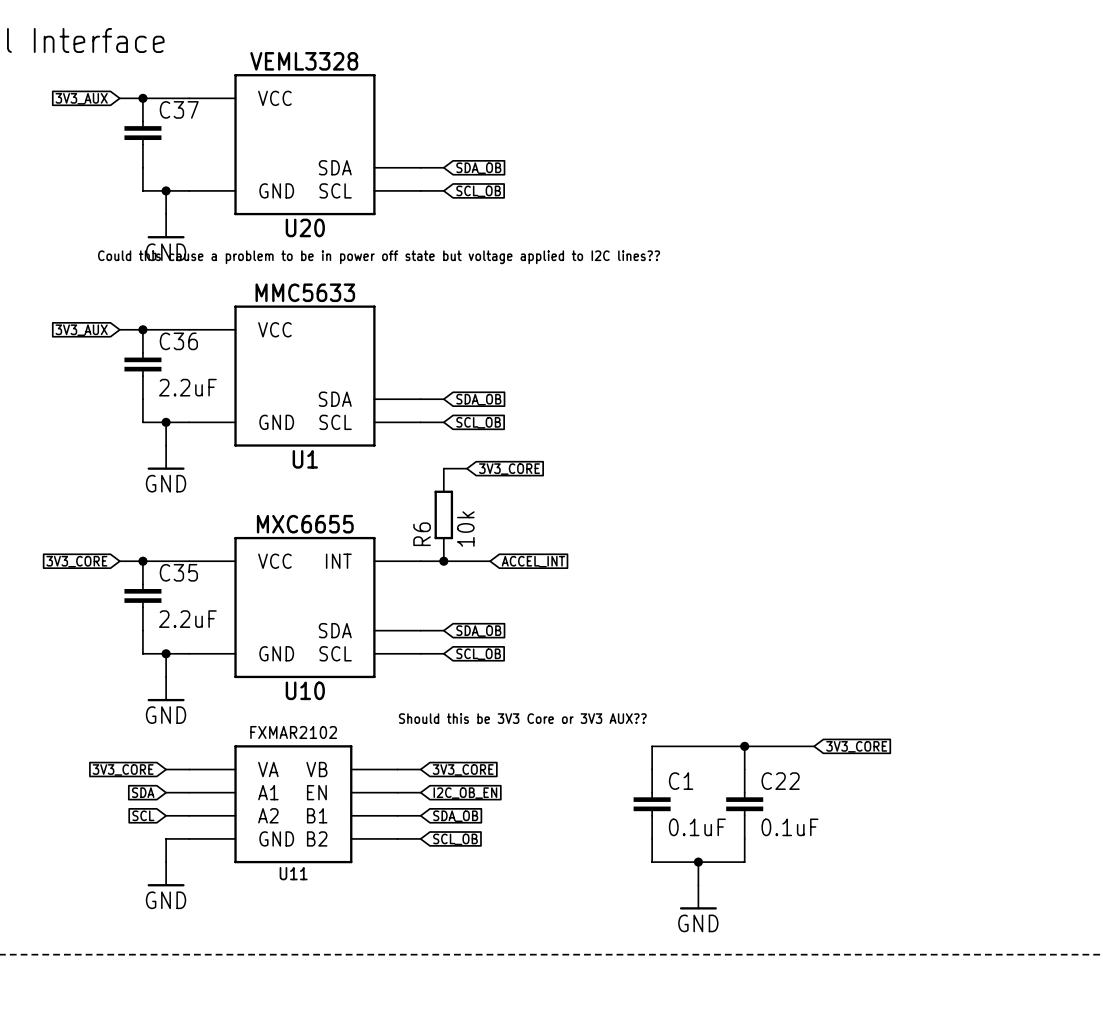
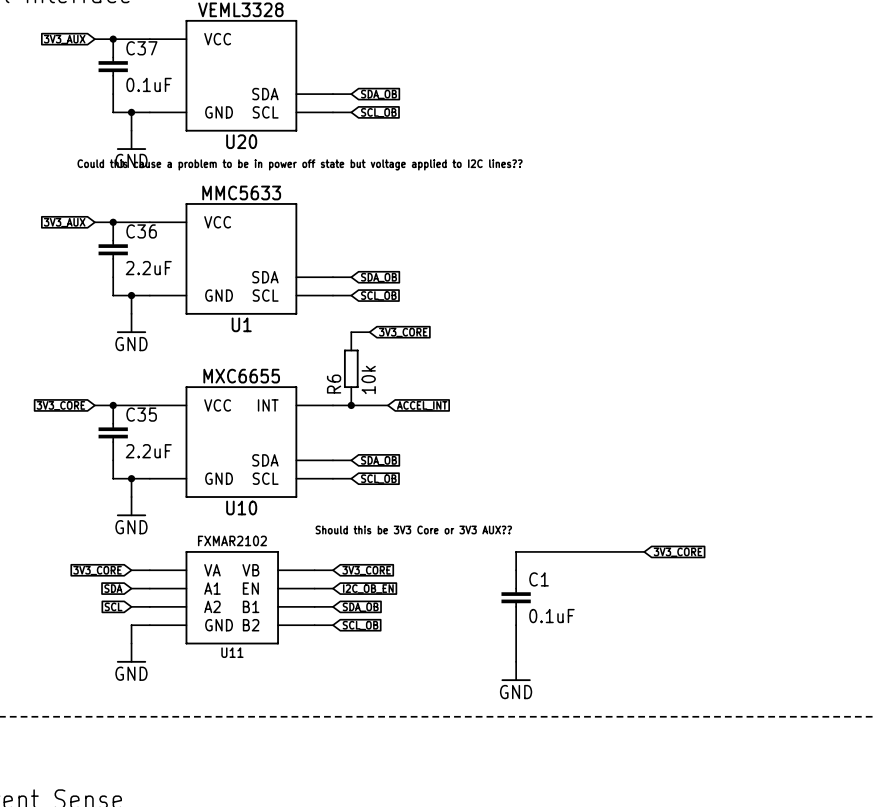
C37 value: none -> 0.1uF (149, 84)
wire: (744, 746) (744, 769) -> none
junction: (744, 746) -> none
C22: 0.1uF (744, 804) -> none
wire: (744, 838) (744, 862) (652, 862) -> (516, 661) (516, 643)
wire: (698, 862) (698, 885) -> none
junction: (698, 862) -> none
power symbol position: GND (698, 897) -> GND (516, 671)

